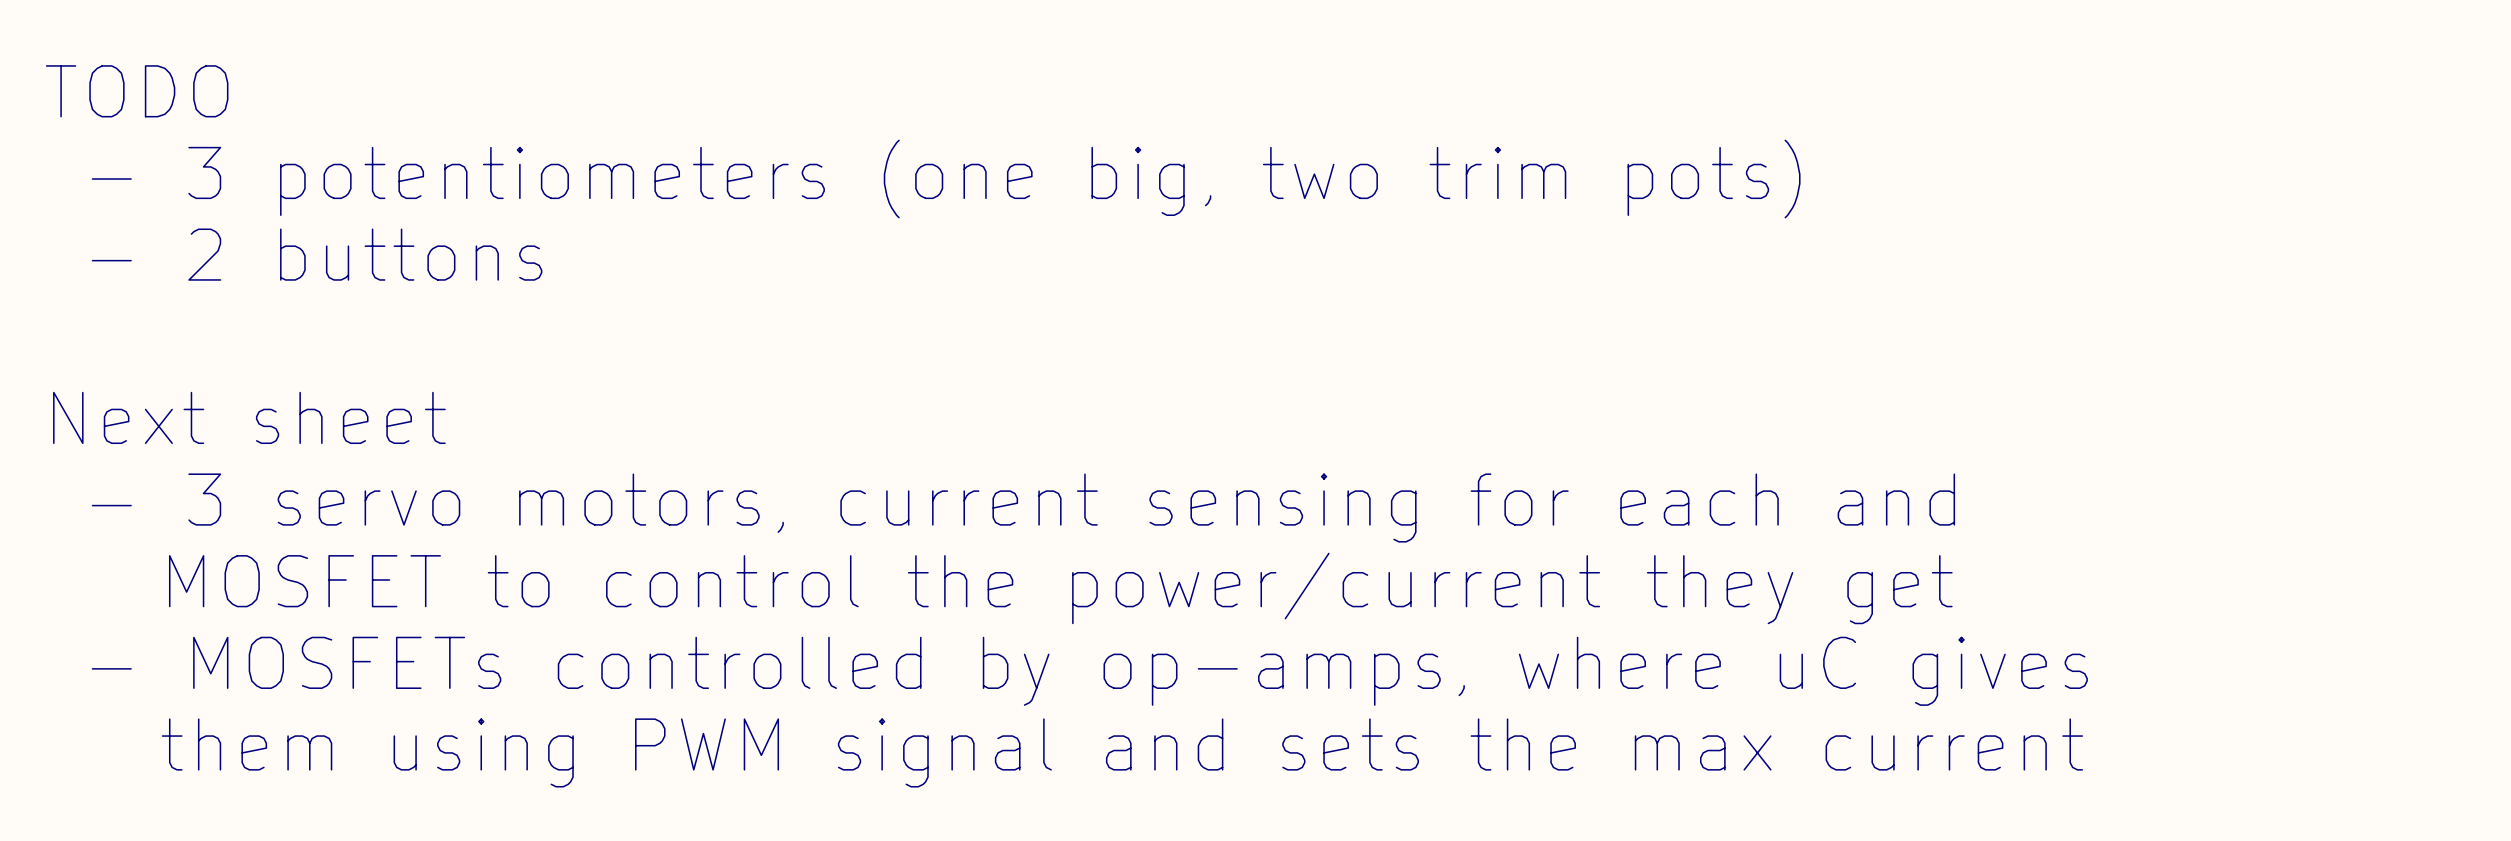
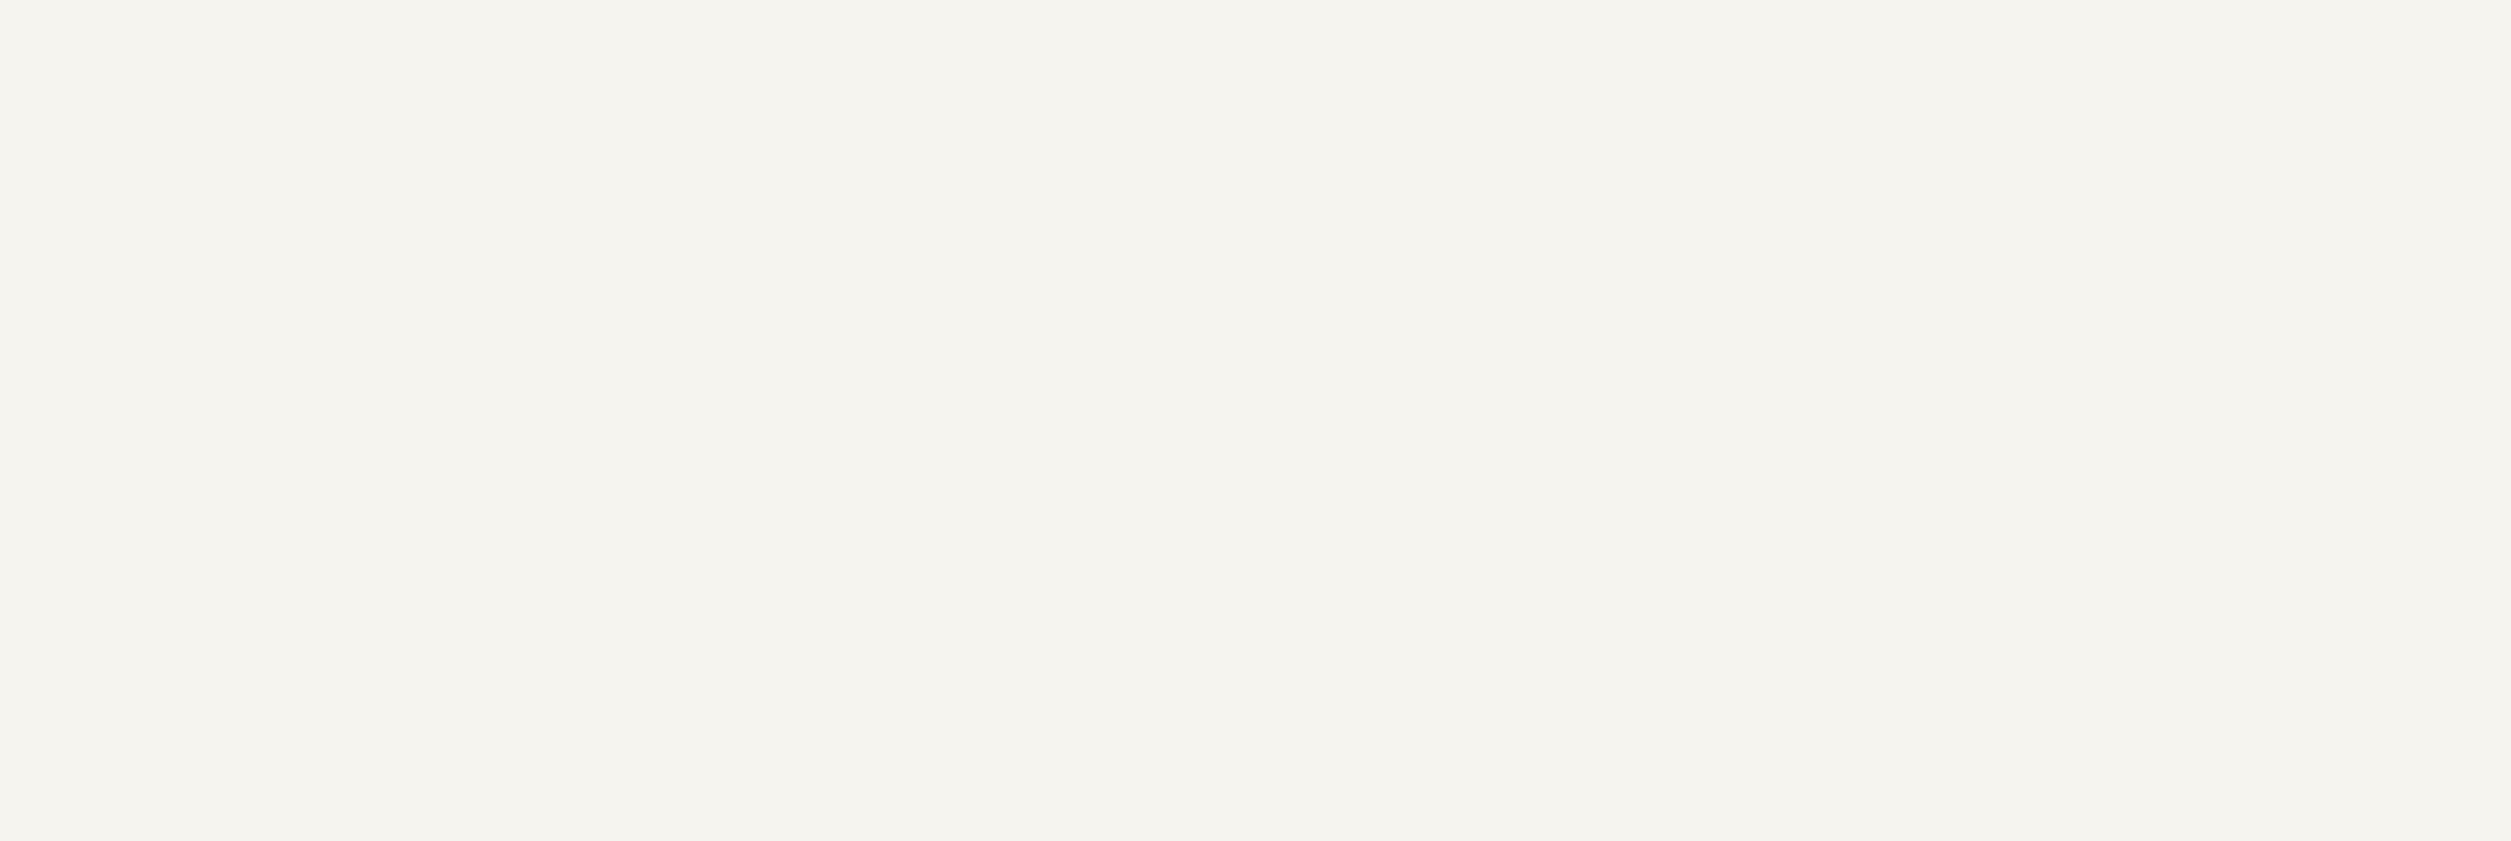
text: TODO (137, 91) -> none
text: - 3 potentiometers (one big, two trim pots) (946, 179) -> none
text: - 2 buttons (317, 254) -> none
text: Next sheet (249, 417) -> none
text: - 3 servo motors, current sensing for each and (1023, 508) -> none
text: MOSFET to control the power/current they get (1060, 588) -> none
text: - MOSFETs controlled by op-amps, where uC gives (1089, 671) -> none
text: them using PWM signal and sets the max current (1122, 752) -> none

